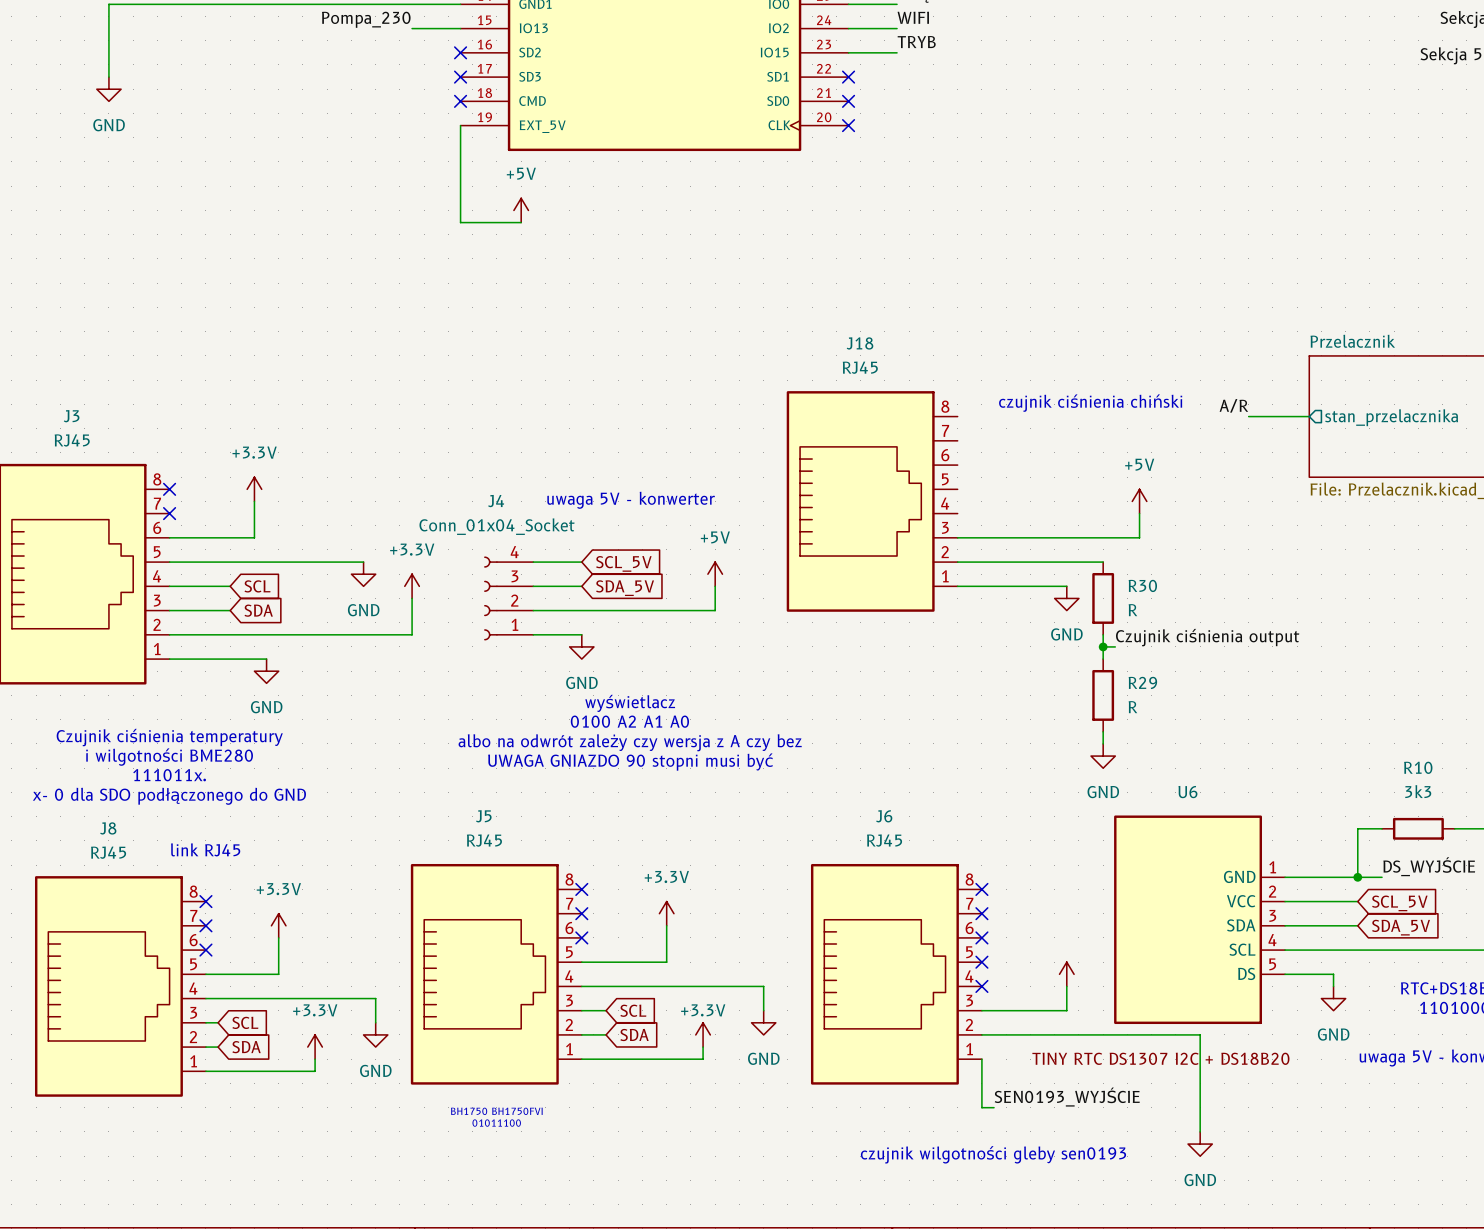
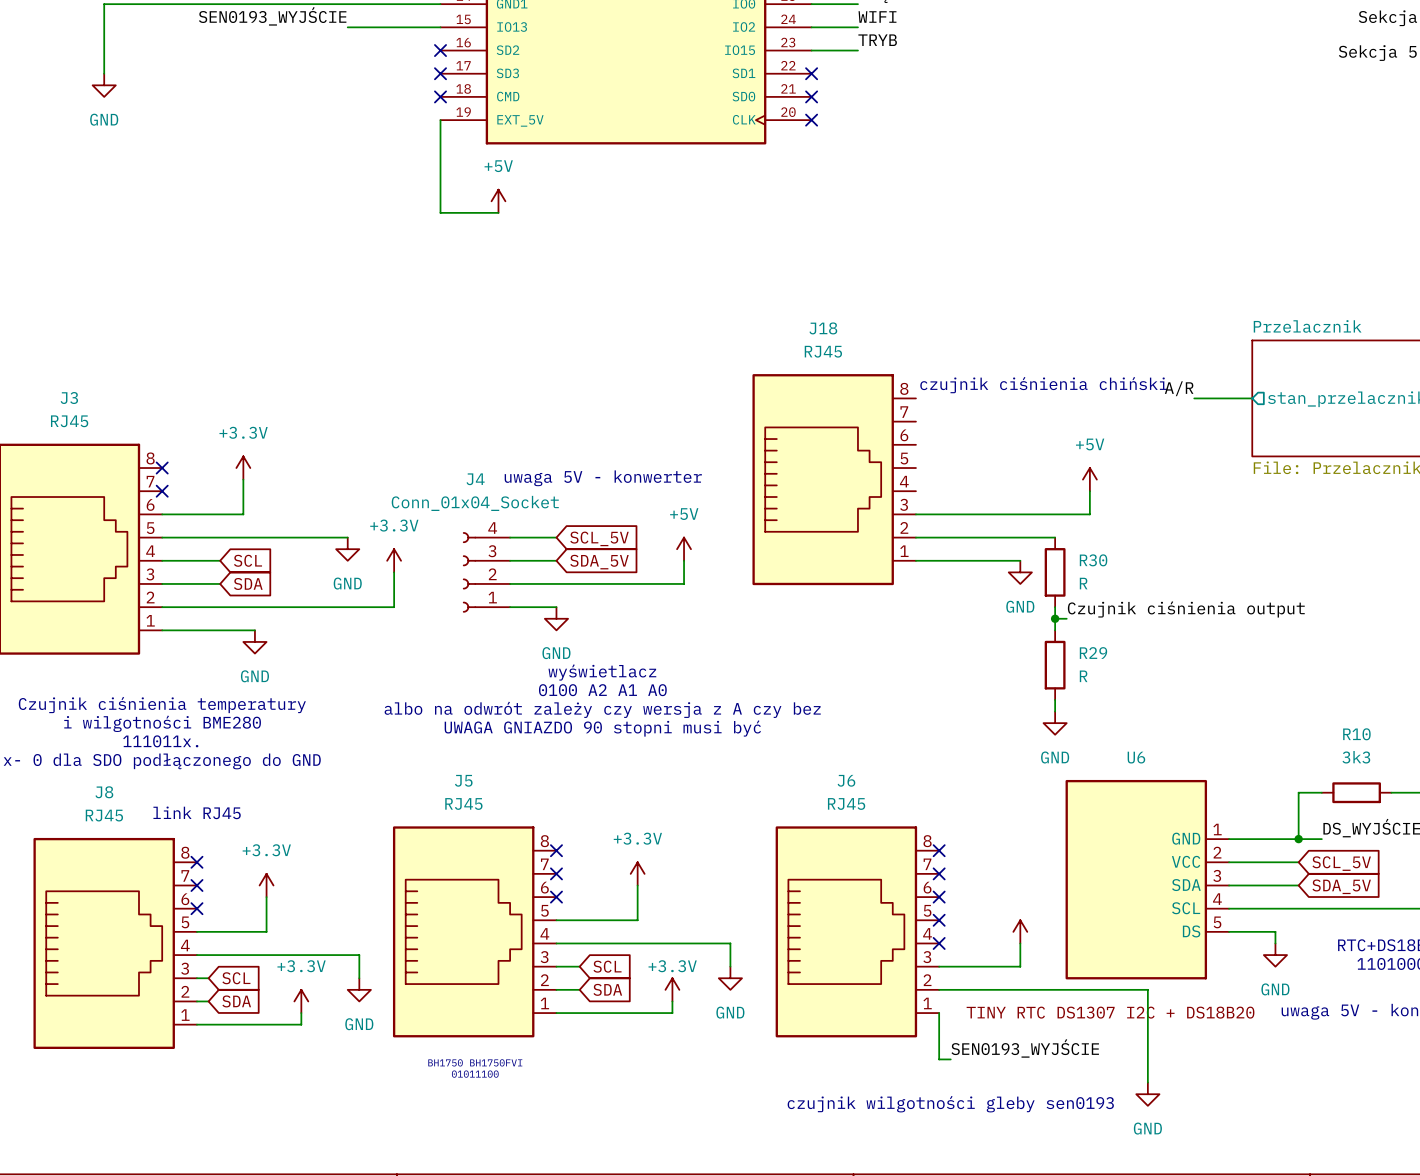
label: none -> SEN0193_WYJŚCIE (272, 16)
label: Pompa_230 (366, 19) -> none
wire: none -> (347, 27) (394, 27)

